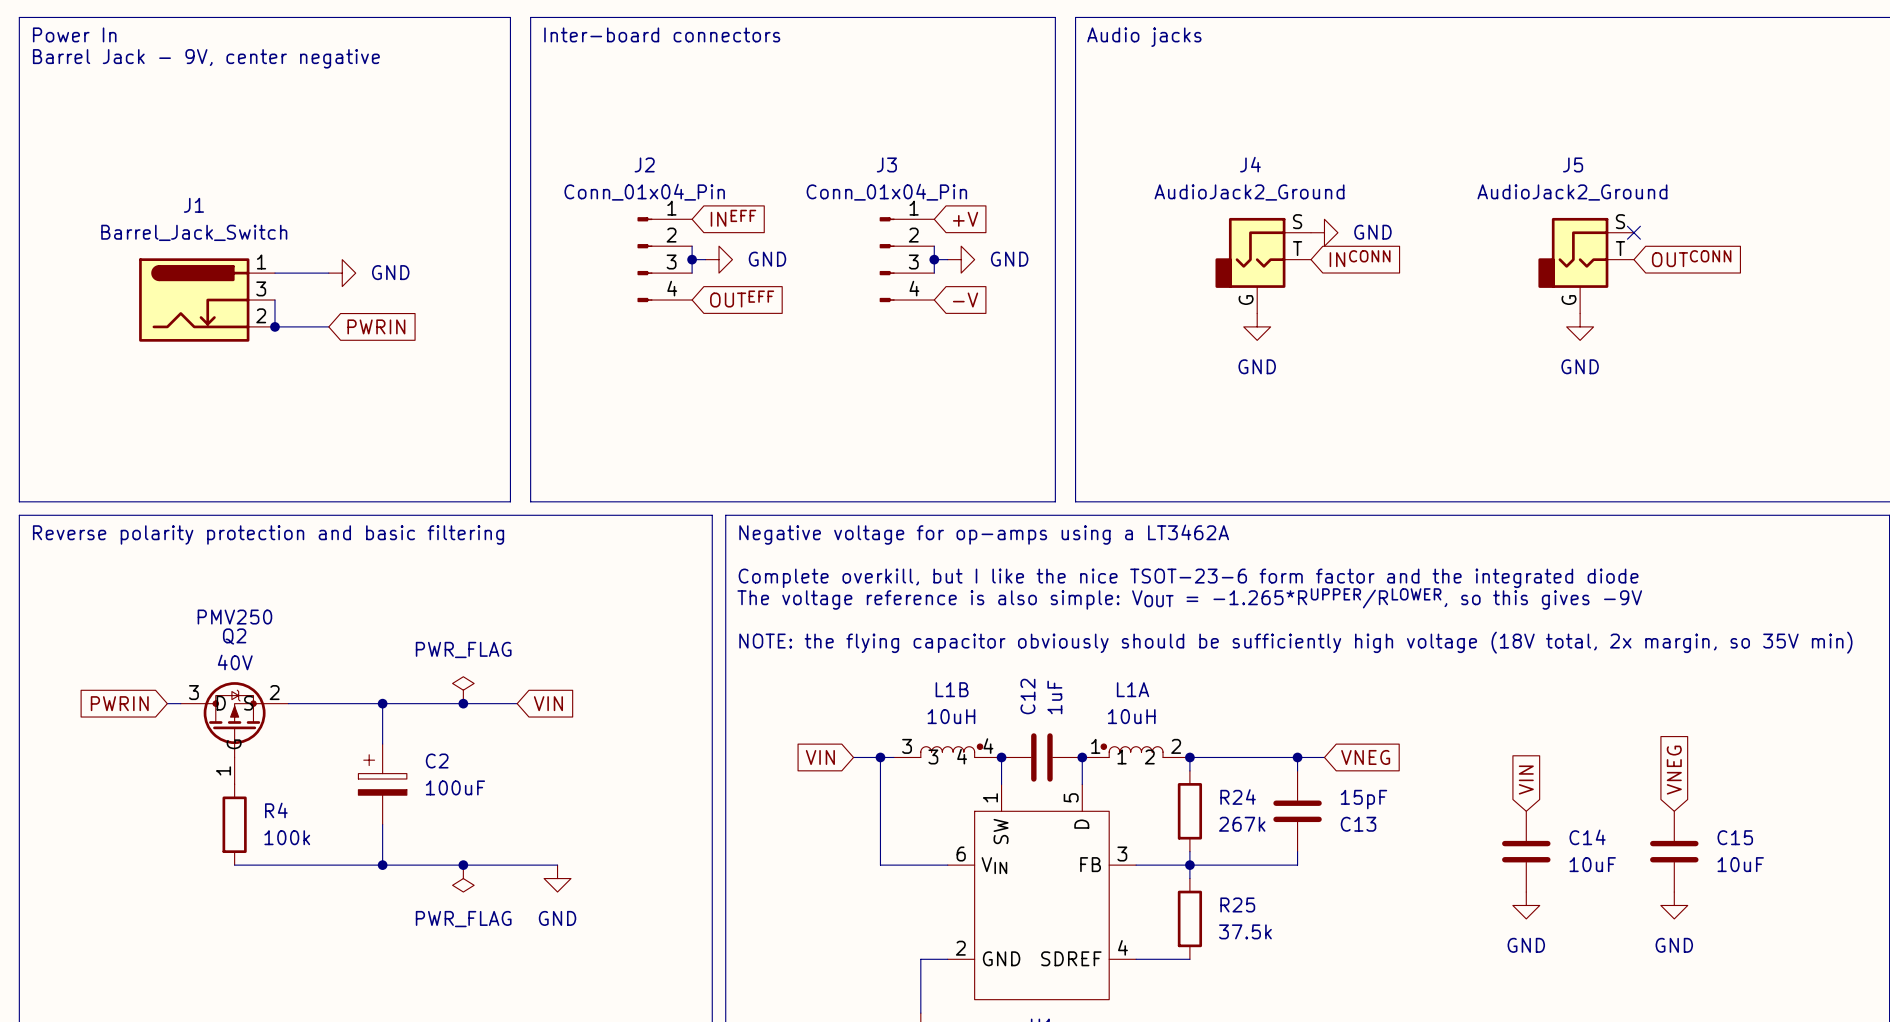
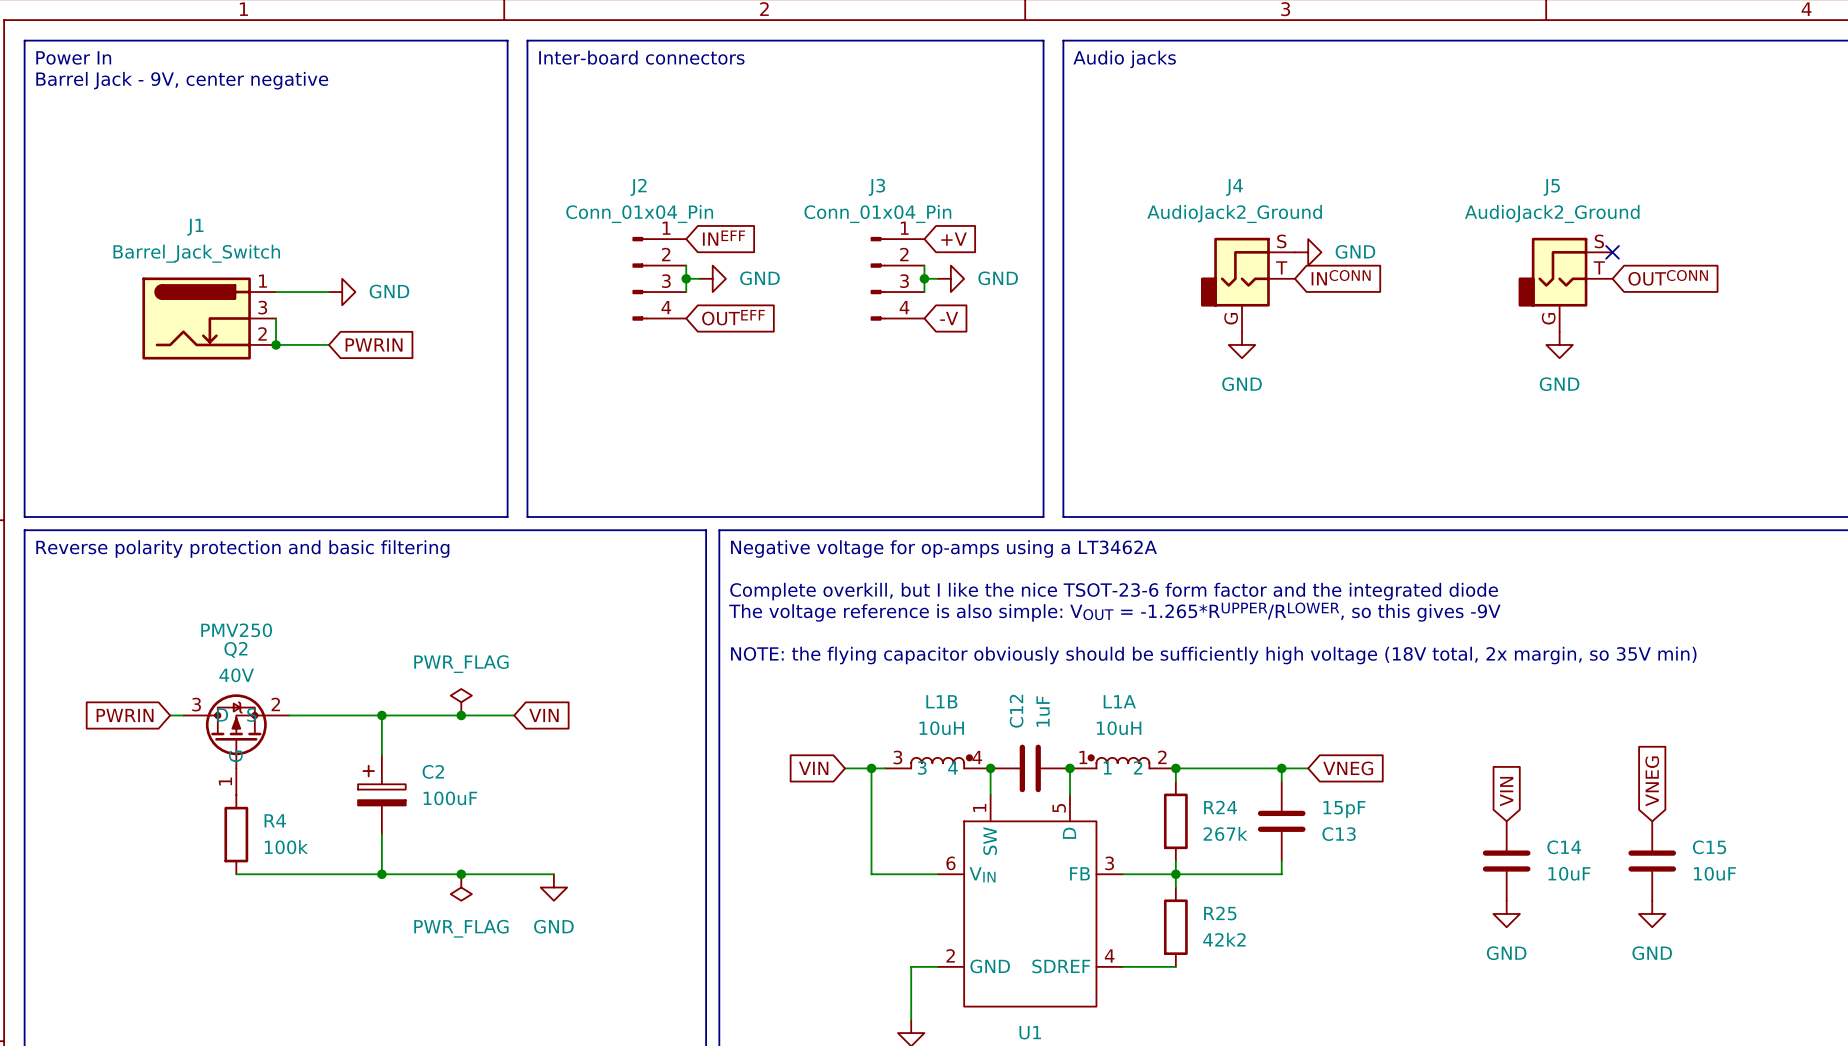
R25 value: 37.5k (1245, 931) -> 42k2 (1224, 939)

